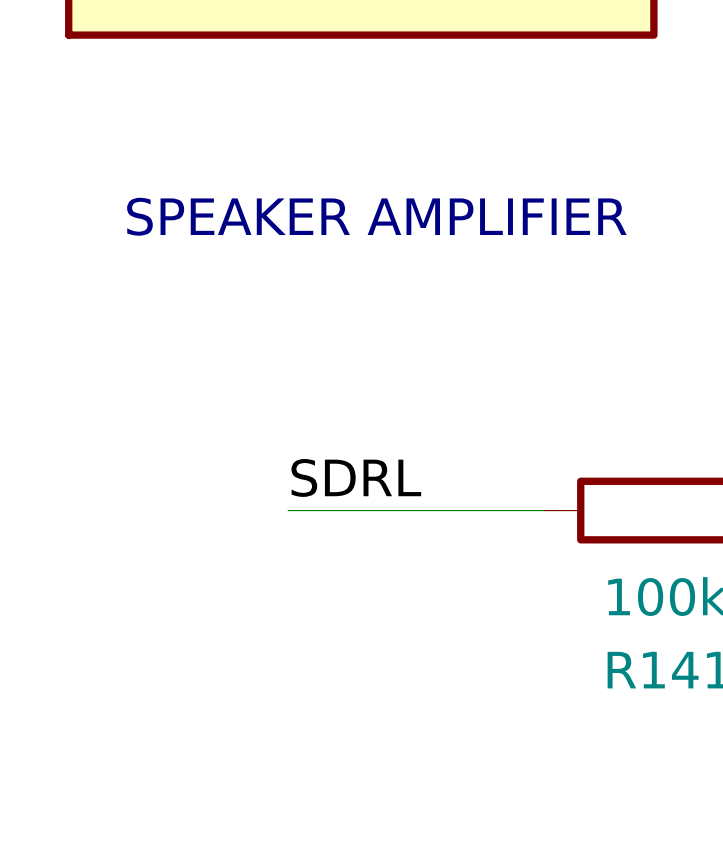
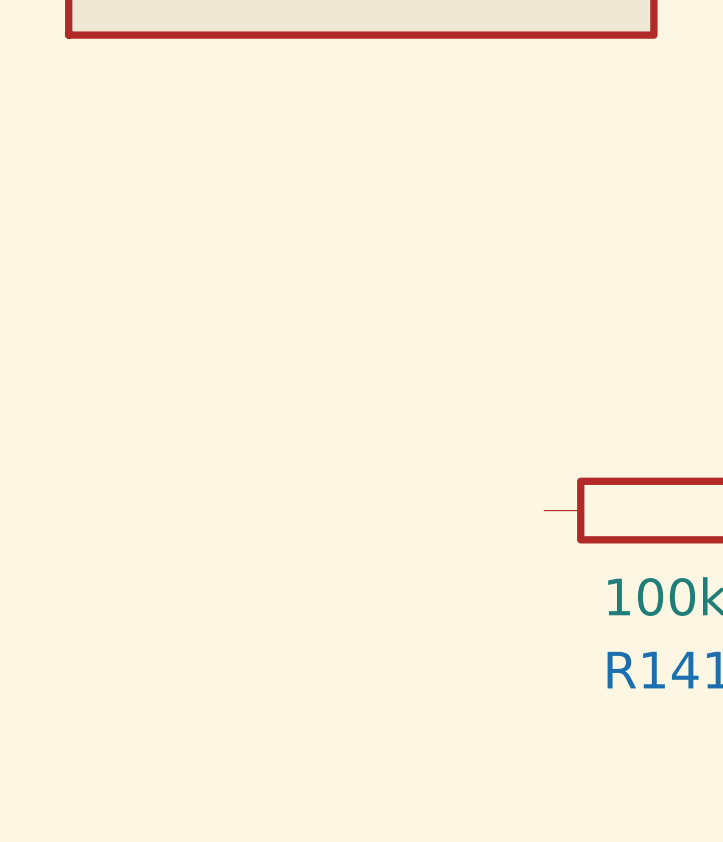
text: SPEAKER AMPLIFIER (376, 216) -> none
label: SDRL (356, 477) -> none
wire: (288, 510) (544, 510) -> none

